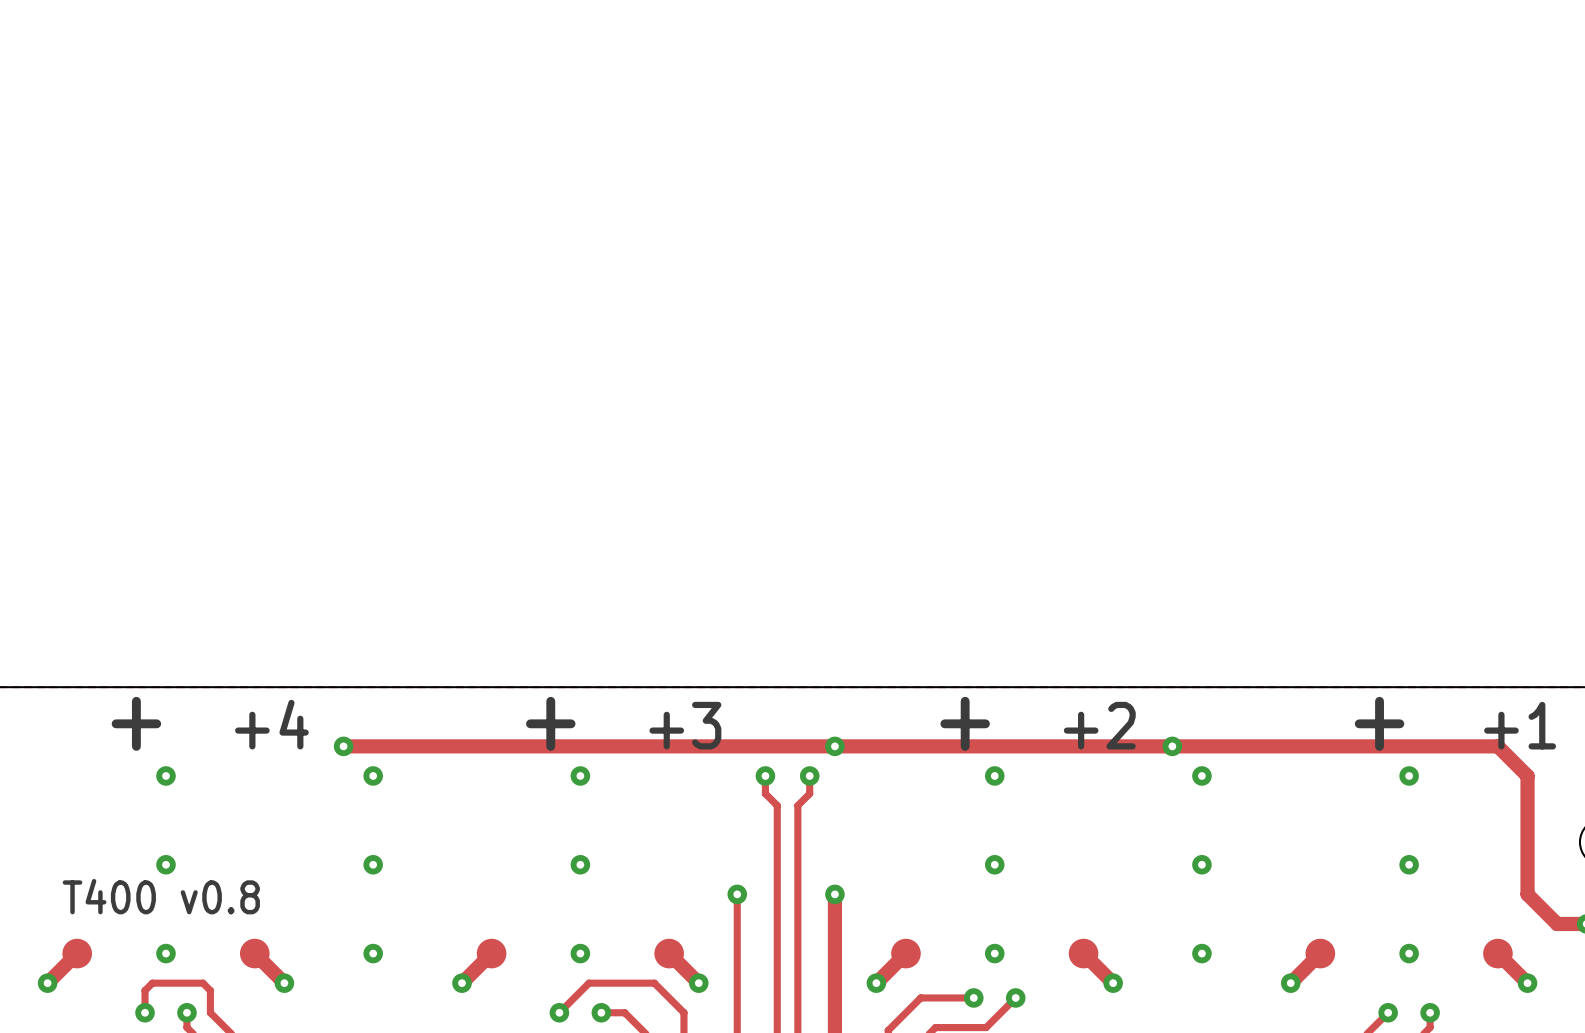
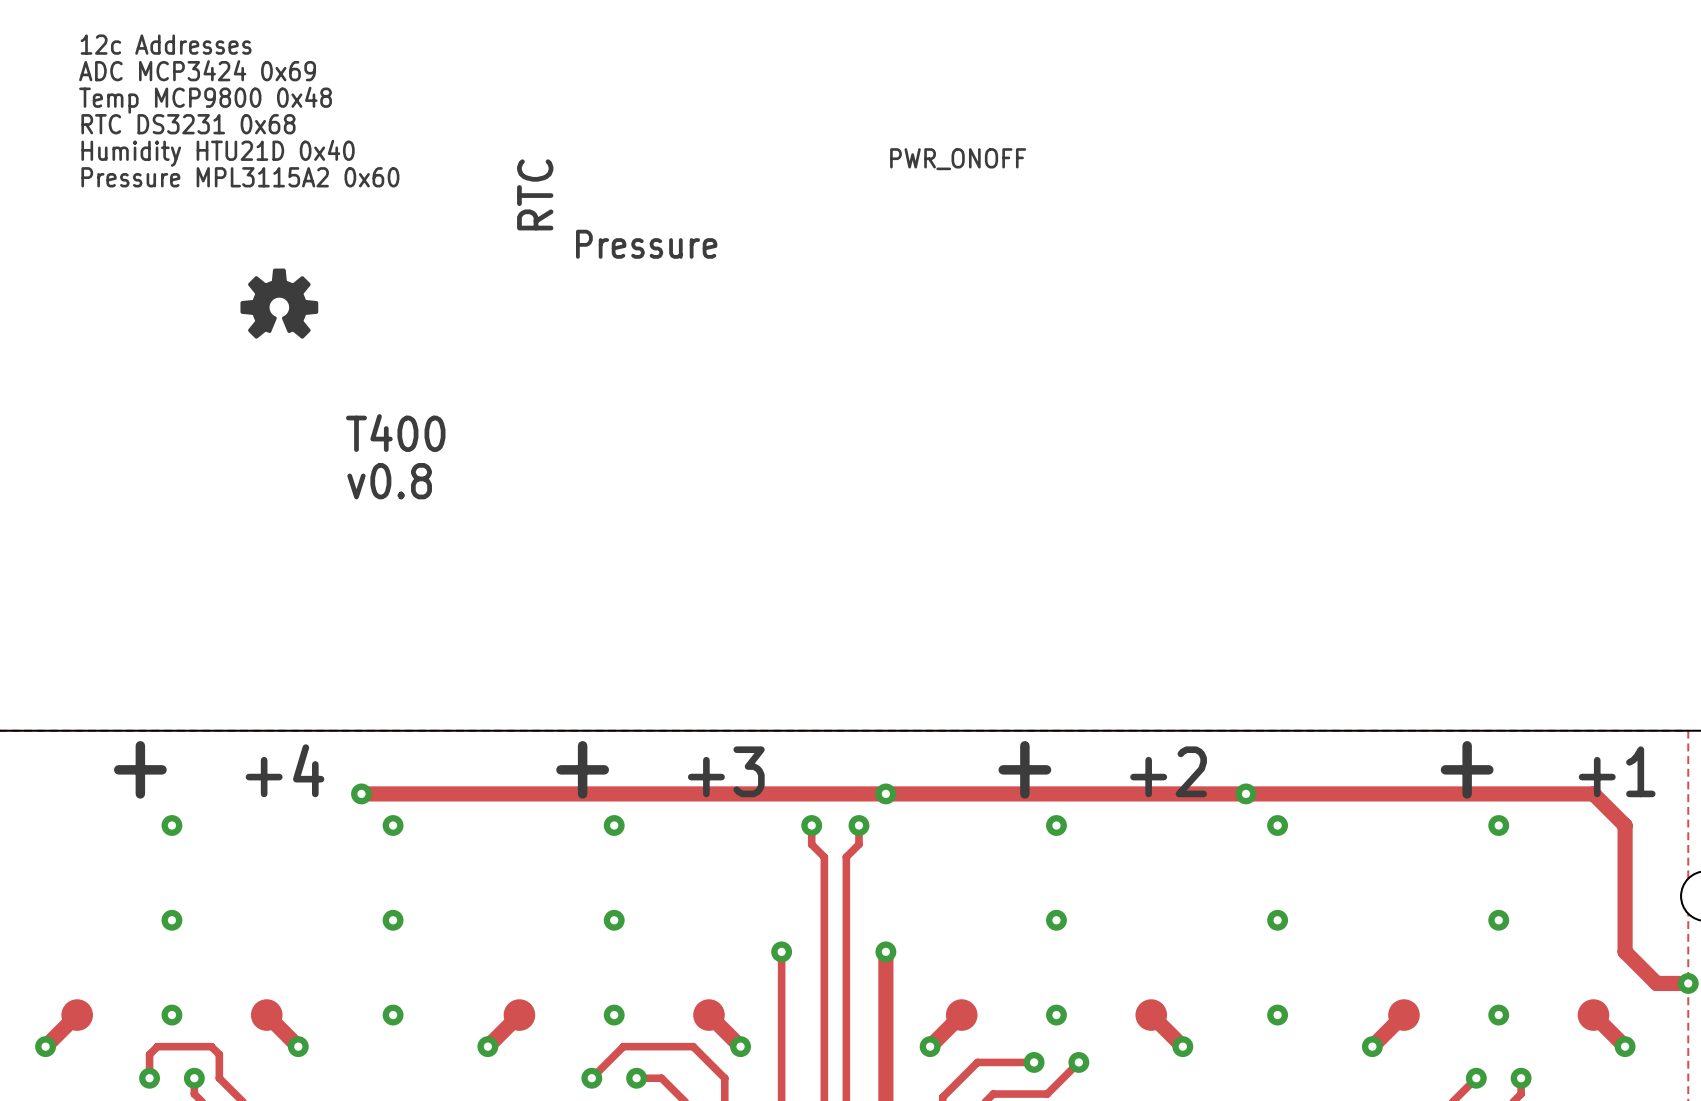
text: none -> 12c Addresses (166, 44)
text: none -> ADC MCP3424 0x69 (197, 70)
text: none -> Temp MCP9800 0x48 (205, 100)
text: none -> RTC DS3231 0x68 (188, 124)
text: none -> Humidity HTU21D 0x40 (218, 153)
text: none -> PWR_ONOFF (958, 159)
text: none -> Pressure MPL3115A2 0x60 (240, 177)
text: none -> RTC (535, 194)
text: none -> Pressure (646, 244)
drawing: none -> [240, 268, 319, 339]
text: none -> T400 (395, 433)
text: none -> v0.8 (389, 481)
text: T400 v0.8 (161, 896) -> none

